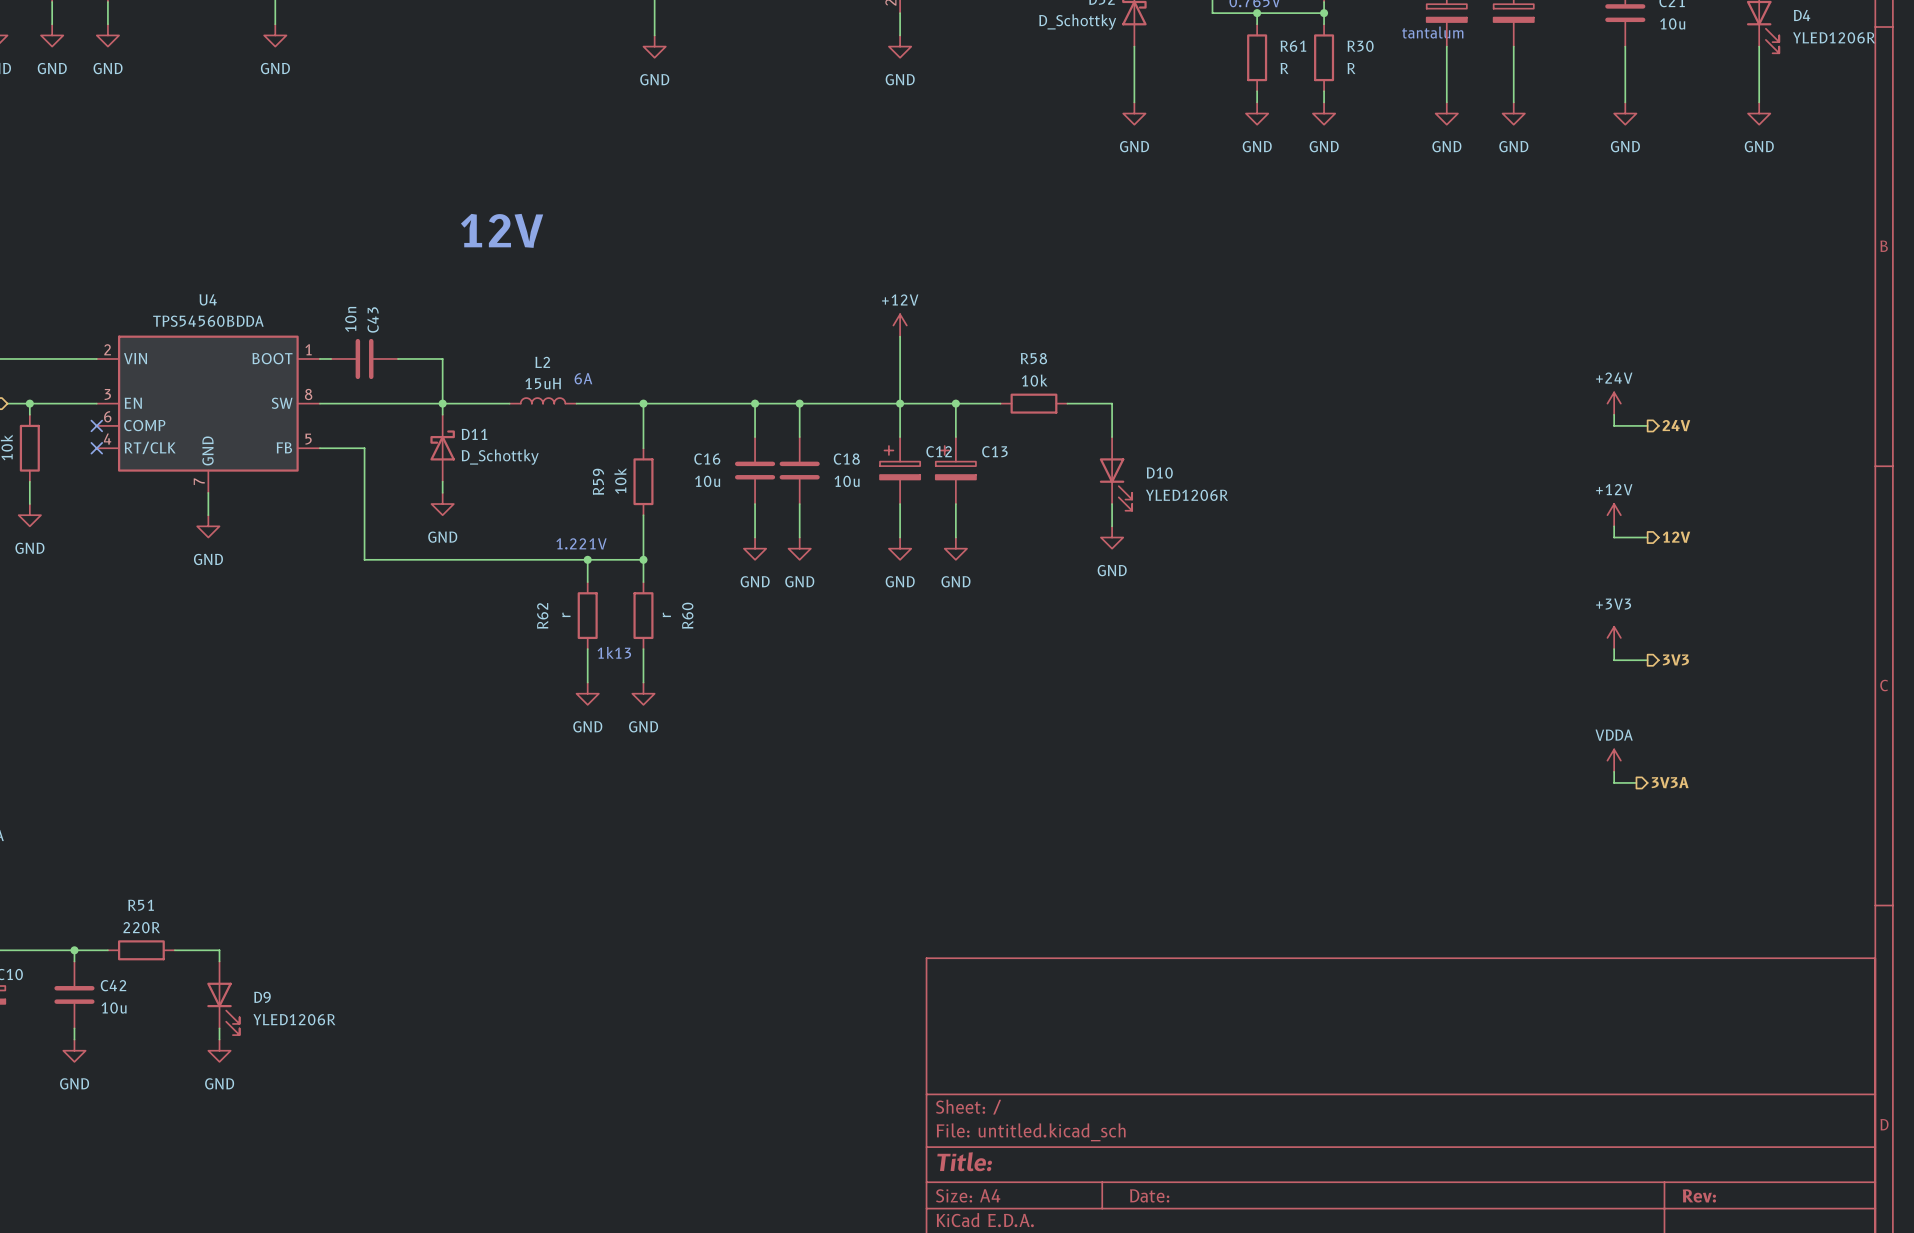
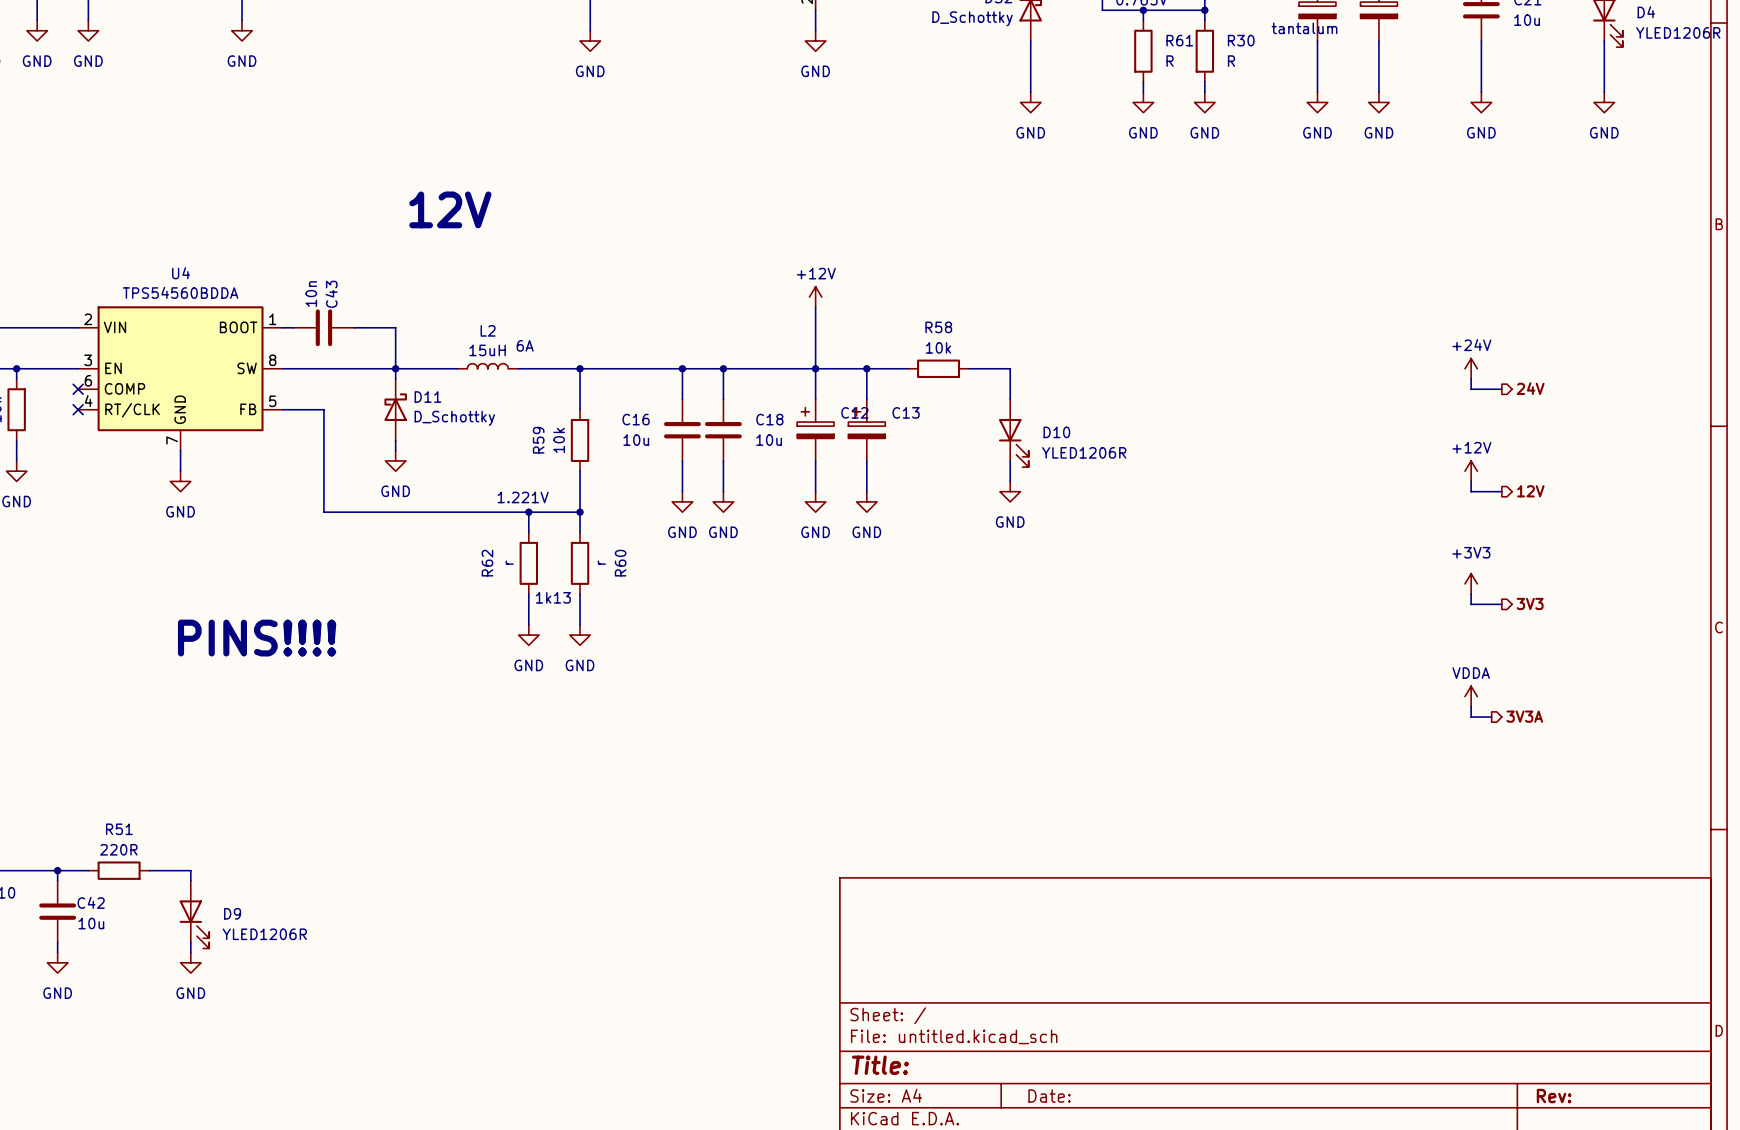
text: none -> PINS!!!! (257, 638)

